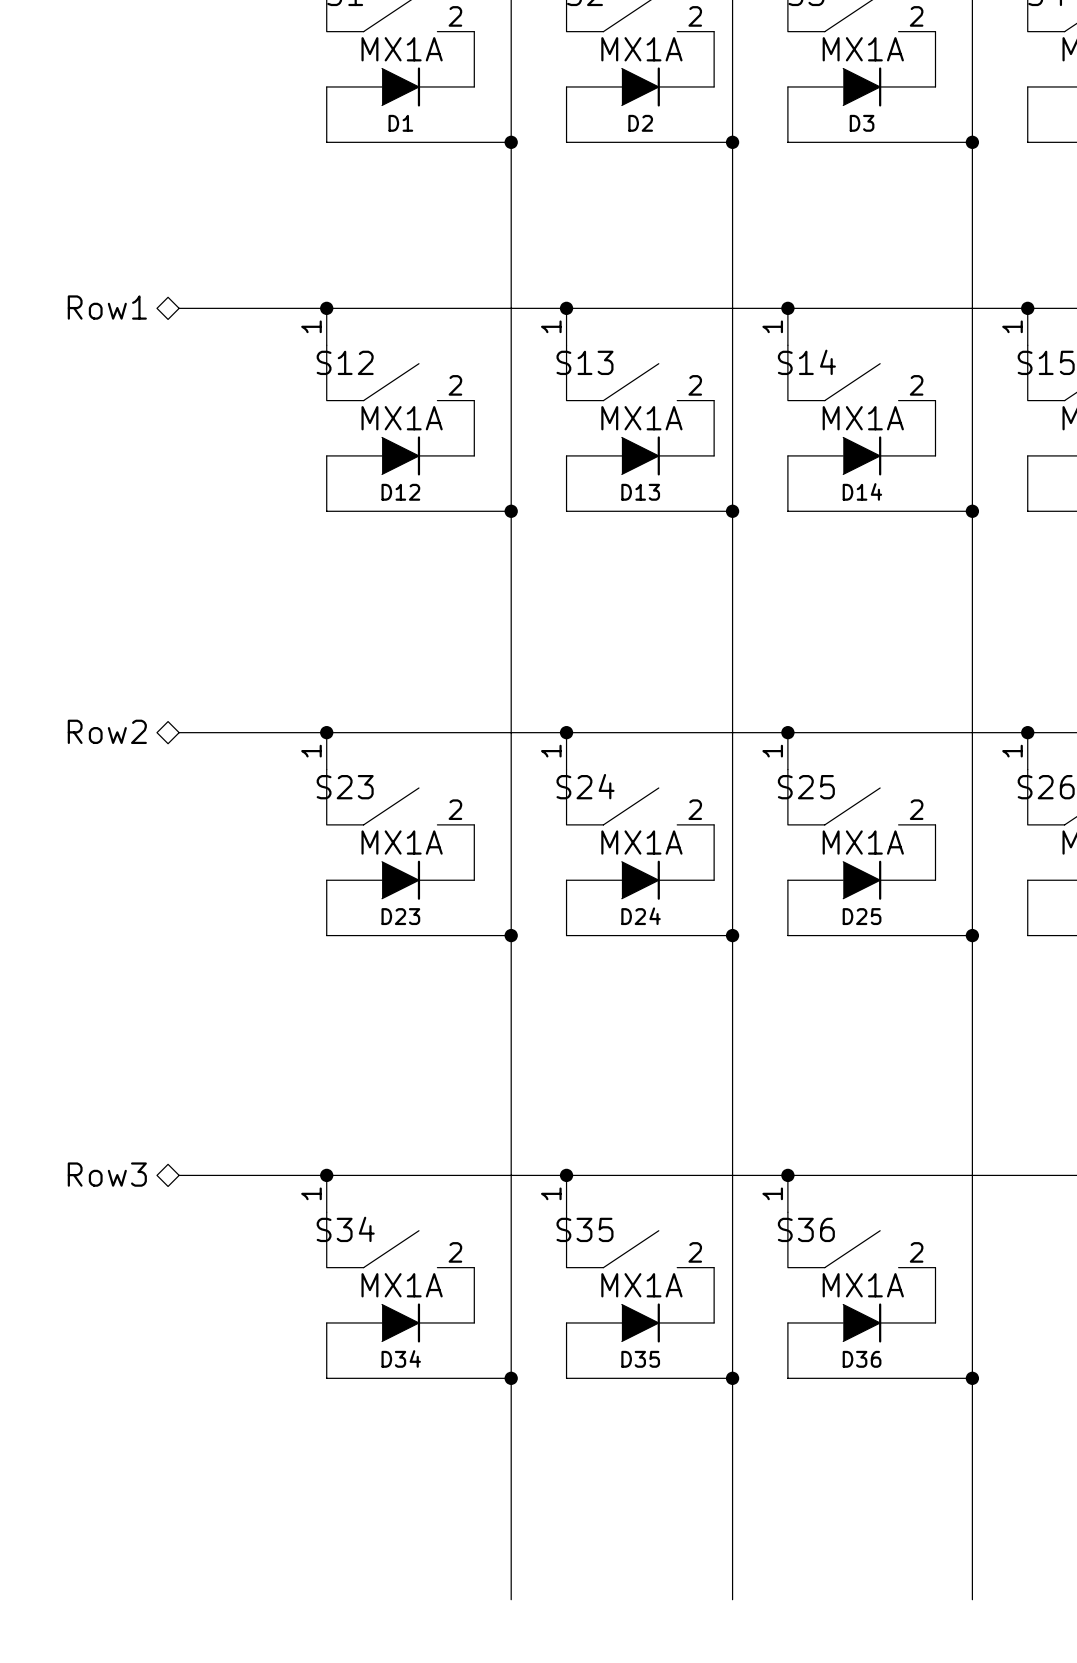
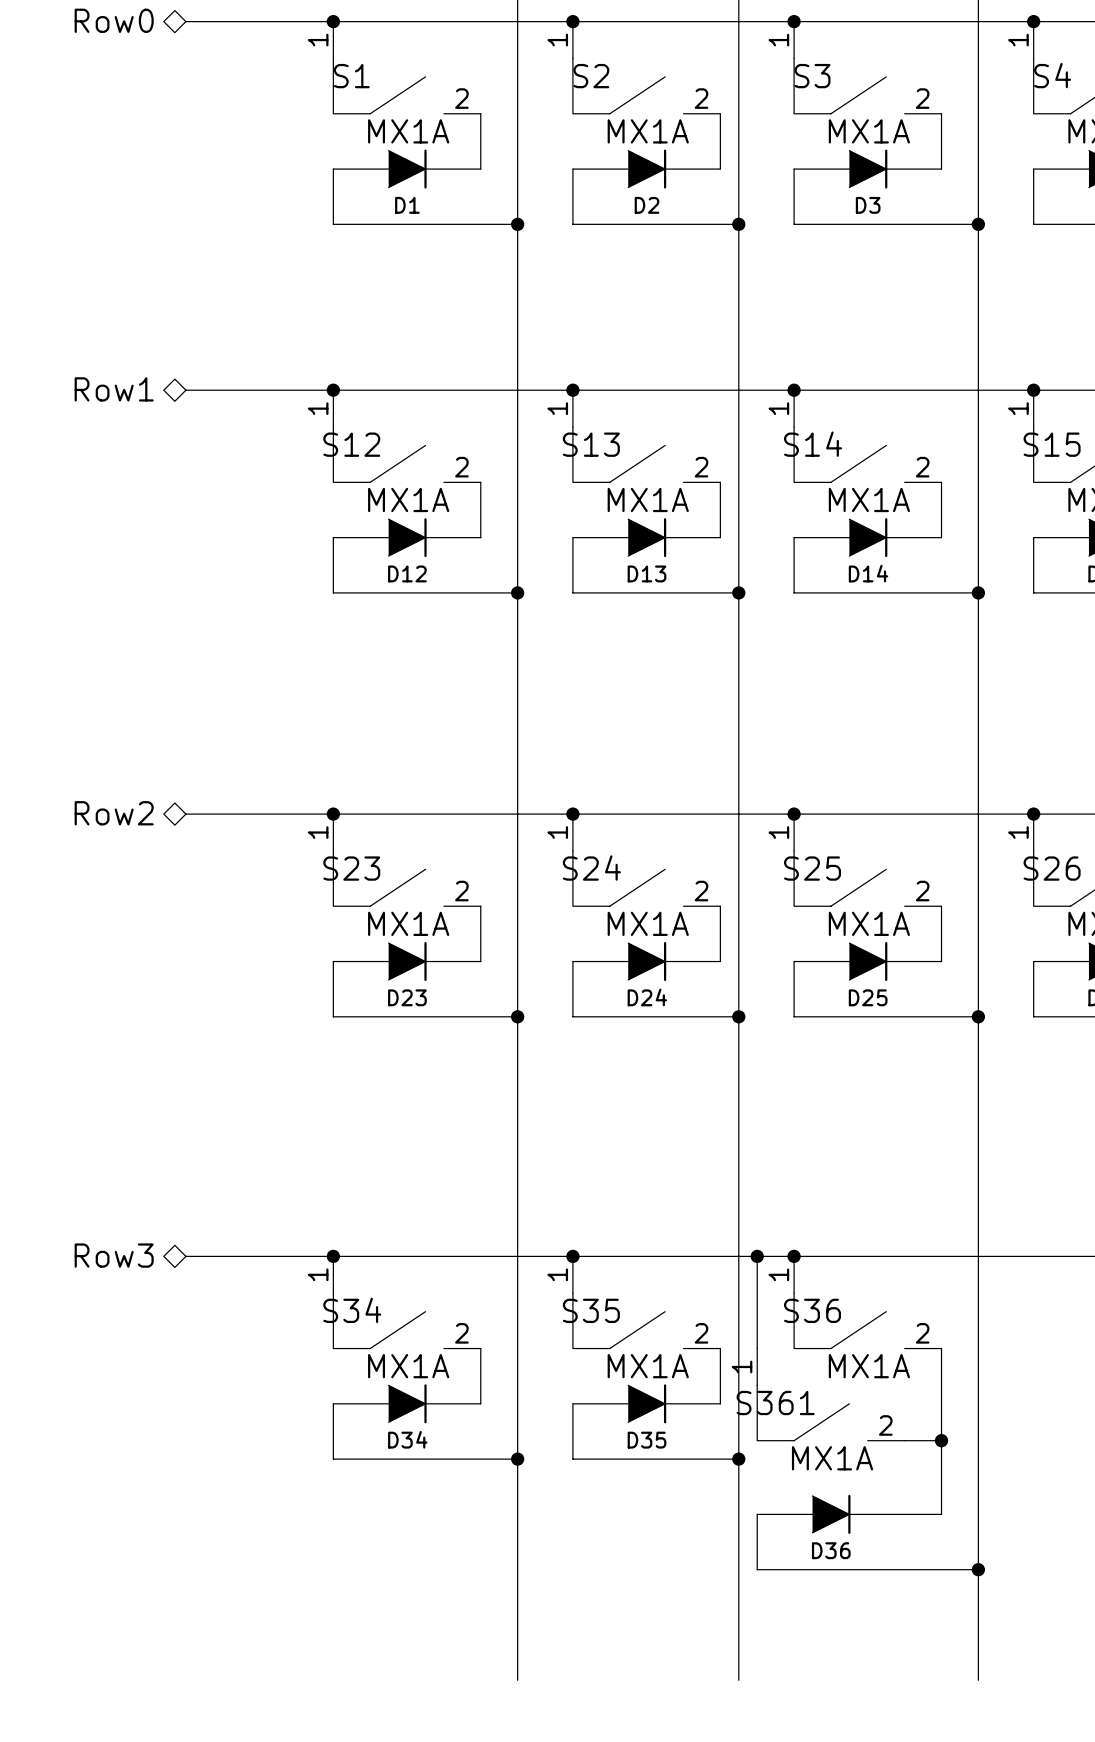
wire: none -> (757, 1256) (757, 1348)
junction: none -> (757, 1256)
S361: none -> MX1A (830, 1394)
wire: (787, 1322) (787, 1378) (972, 1378) -> none
D36 position: (861, 1322) -> (830, 1514)
wire: none -> (941, 1403) (941, 1514) (904, 1514)
wire: none -> (904, 1440) (941, 1440)
junction position: (972, 1378) -> (941, 1440)
wire: none -> (757, 1514) (757, 1569) (978, 1569)
junction: none -> (978, 1569)

